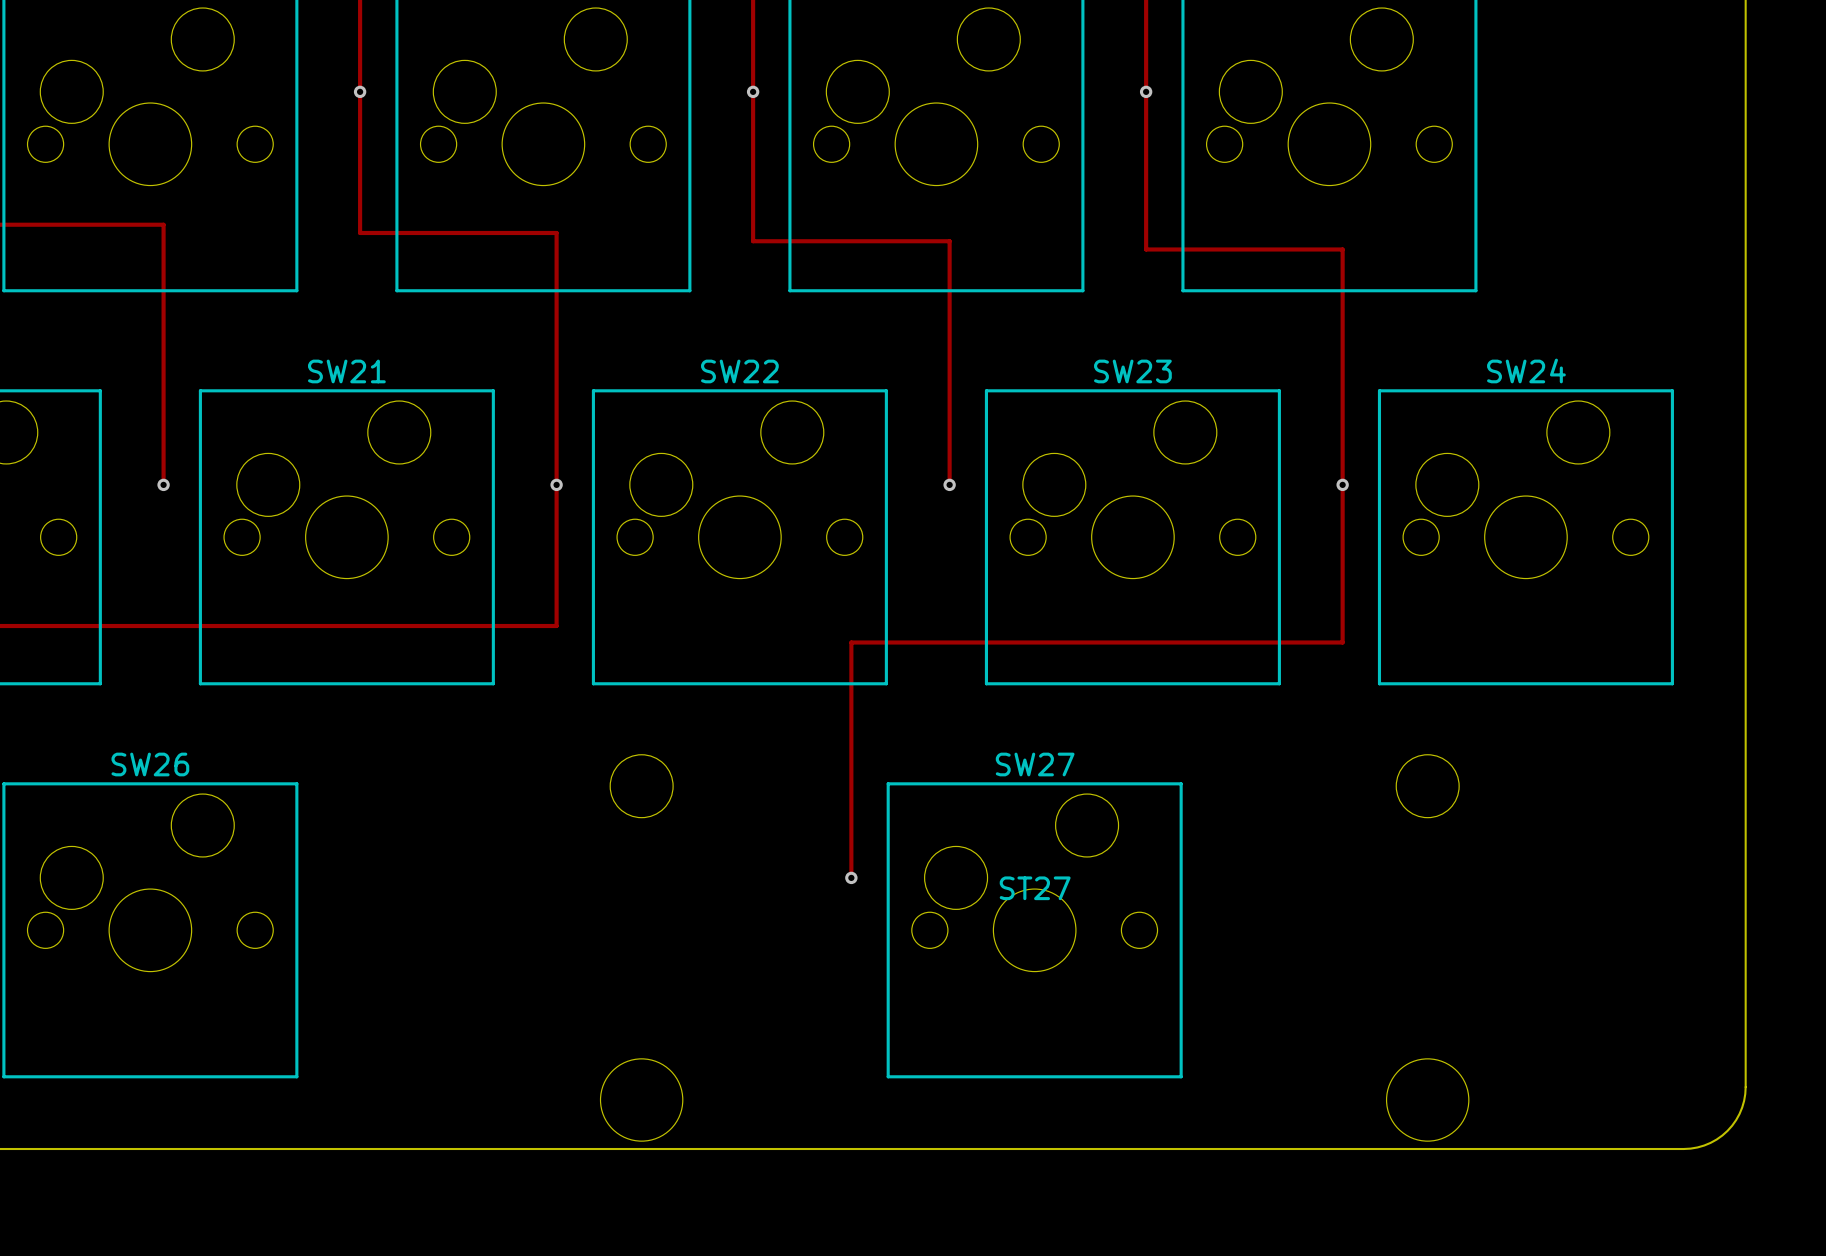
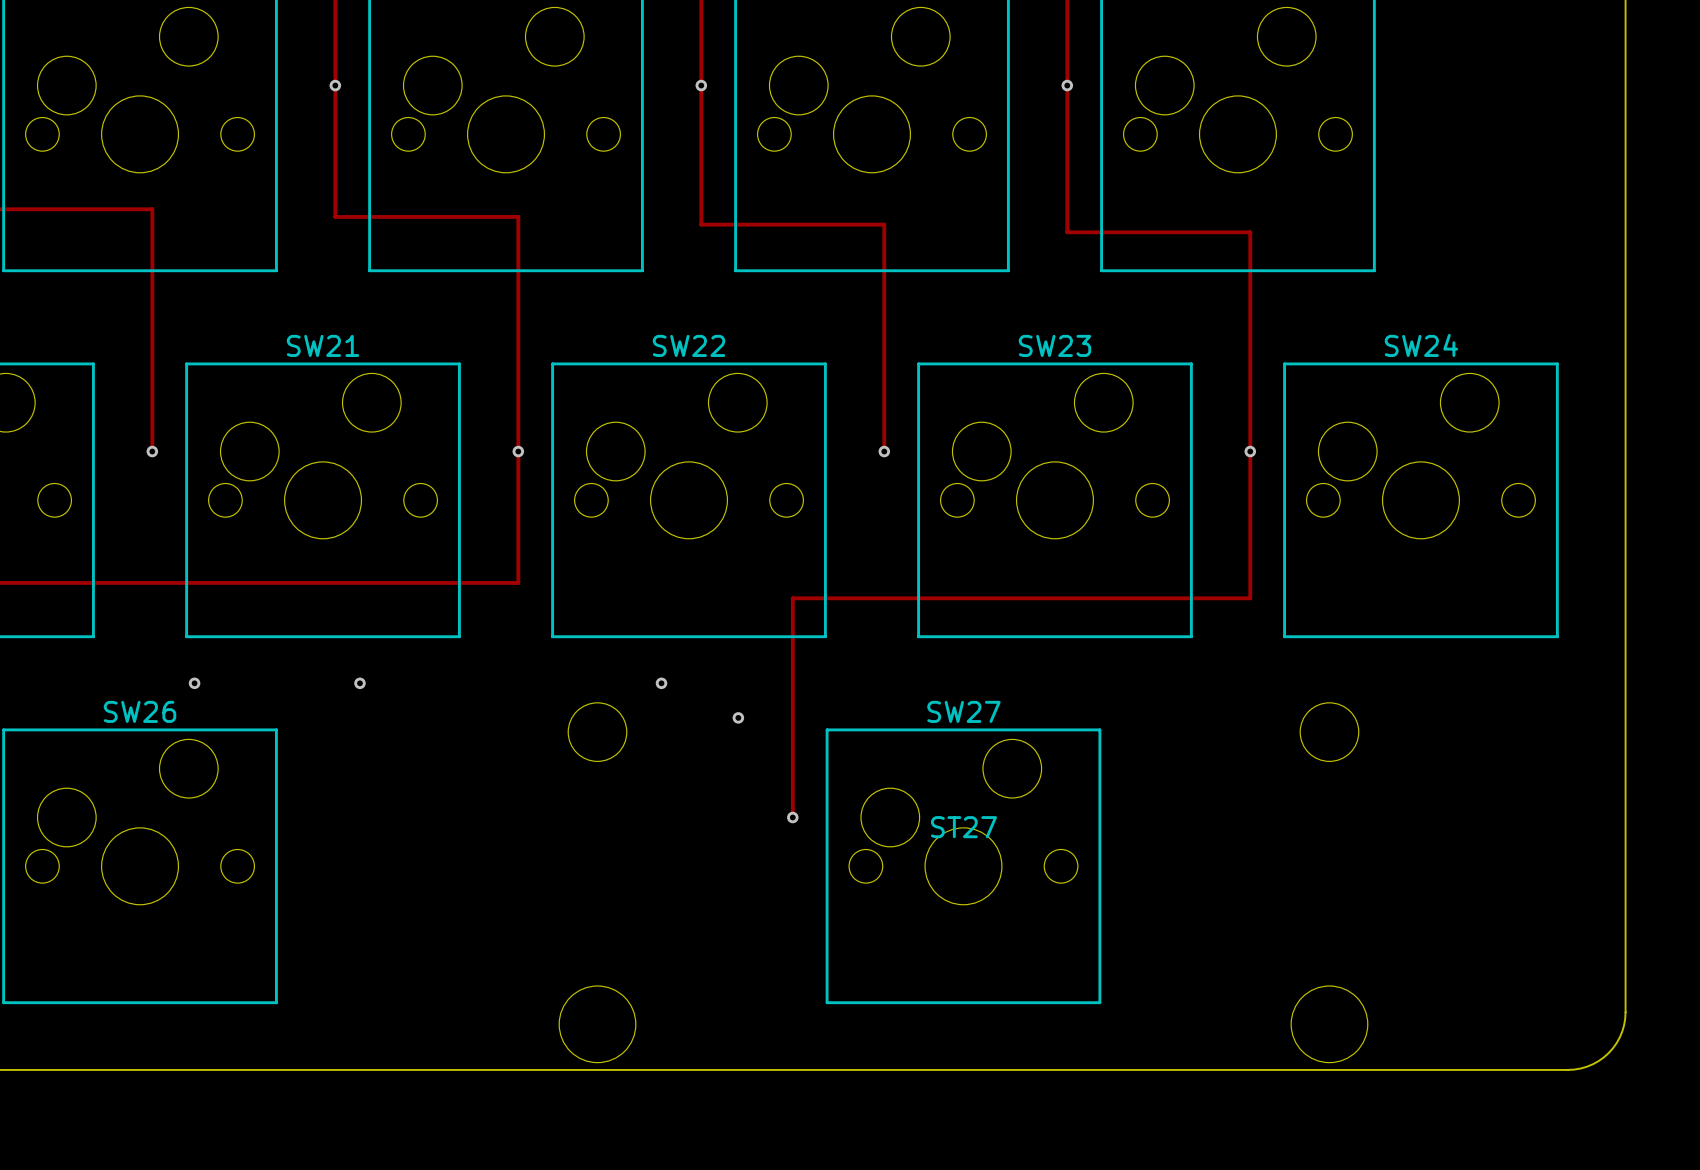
via: none -> (194, 683)
via: none -> (359, 683)
via: none -> (661, 683)
via: none -> (738, 717)

